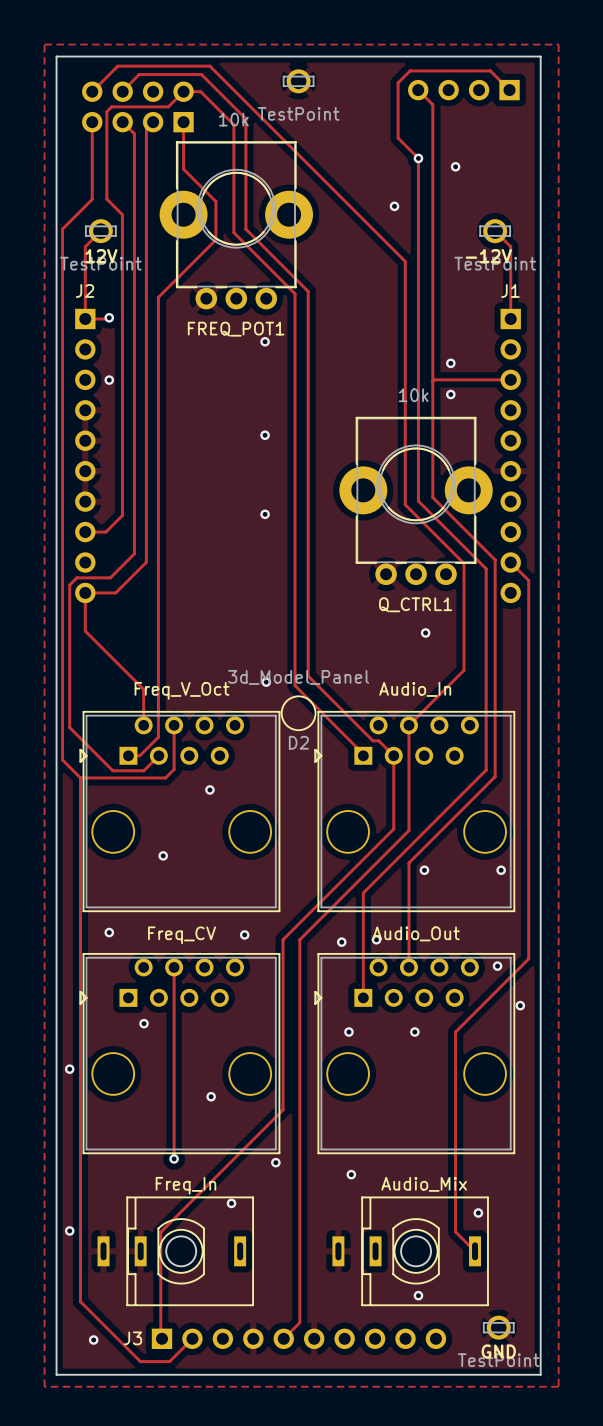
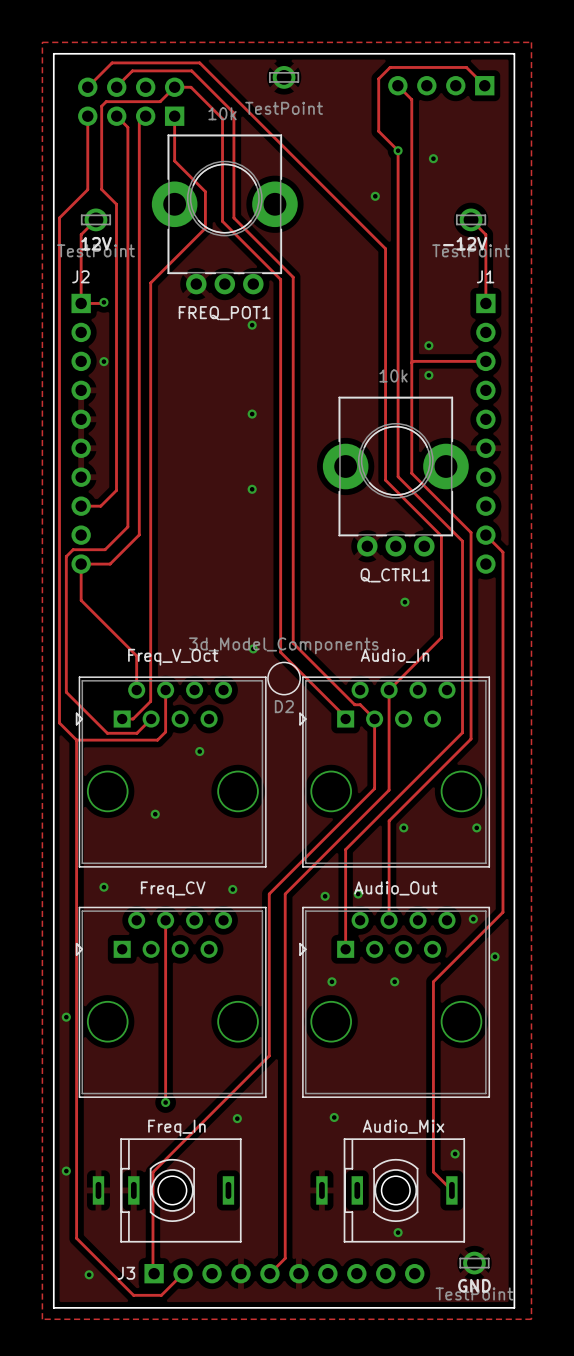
D2 value: 3d_Model_Panel (298, 677) -> 3d_Model_Components (283, 645)
via: (144, 1023) -> none
via: (211, 1096) -> none
via: (275, 1162) -> none
via: none -> (237, 1118)
via: (231, 1203) -> none

